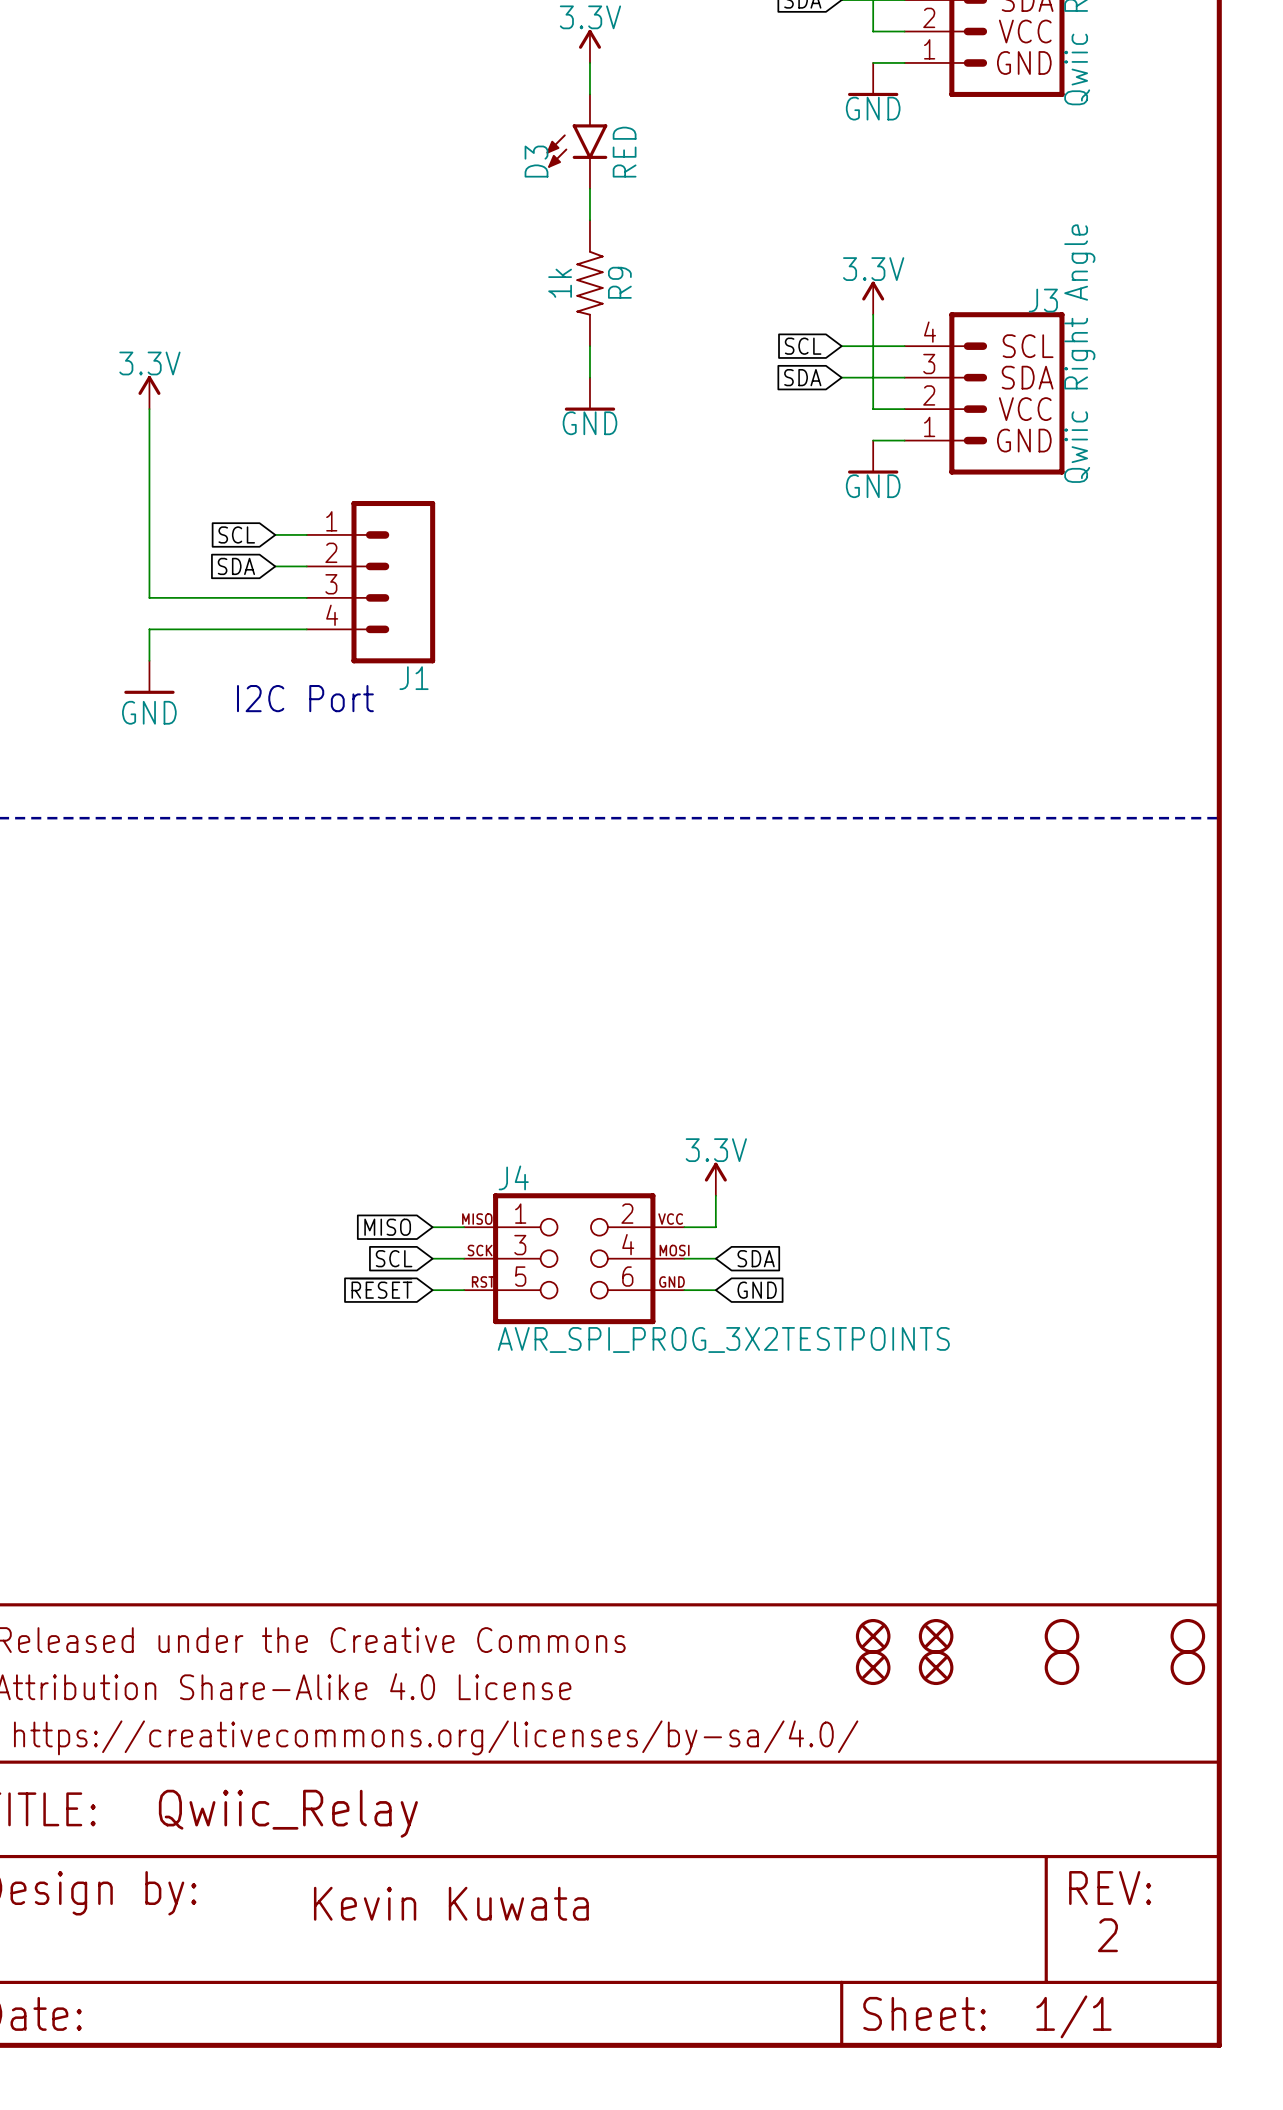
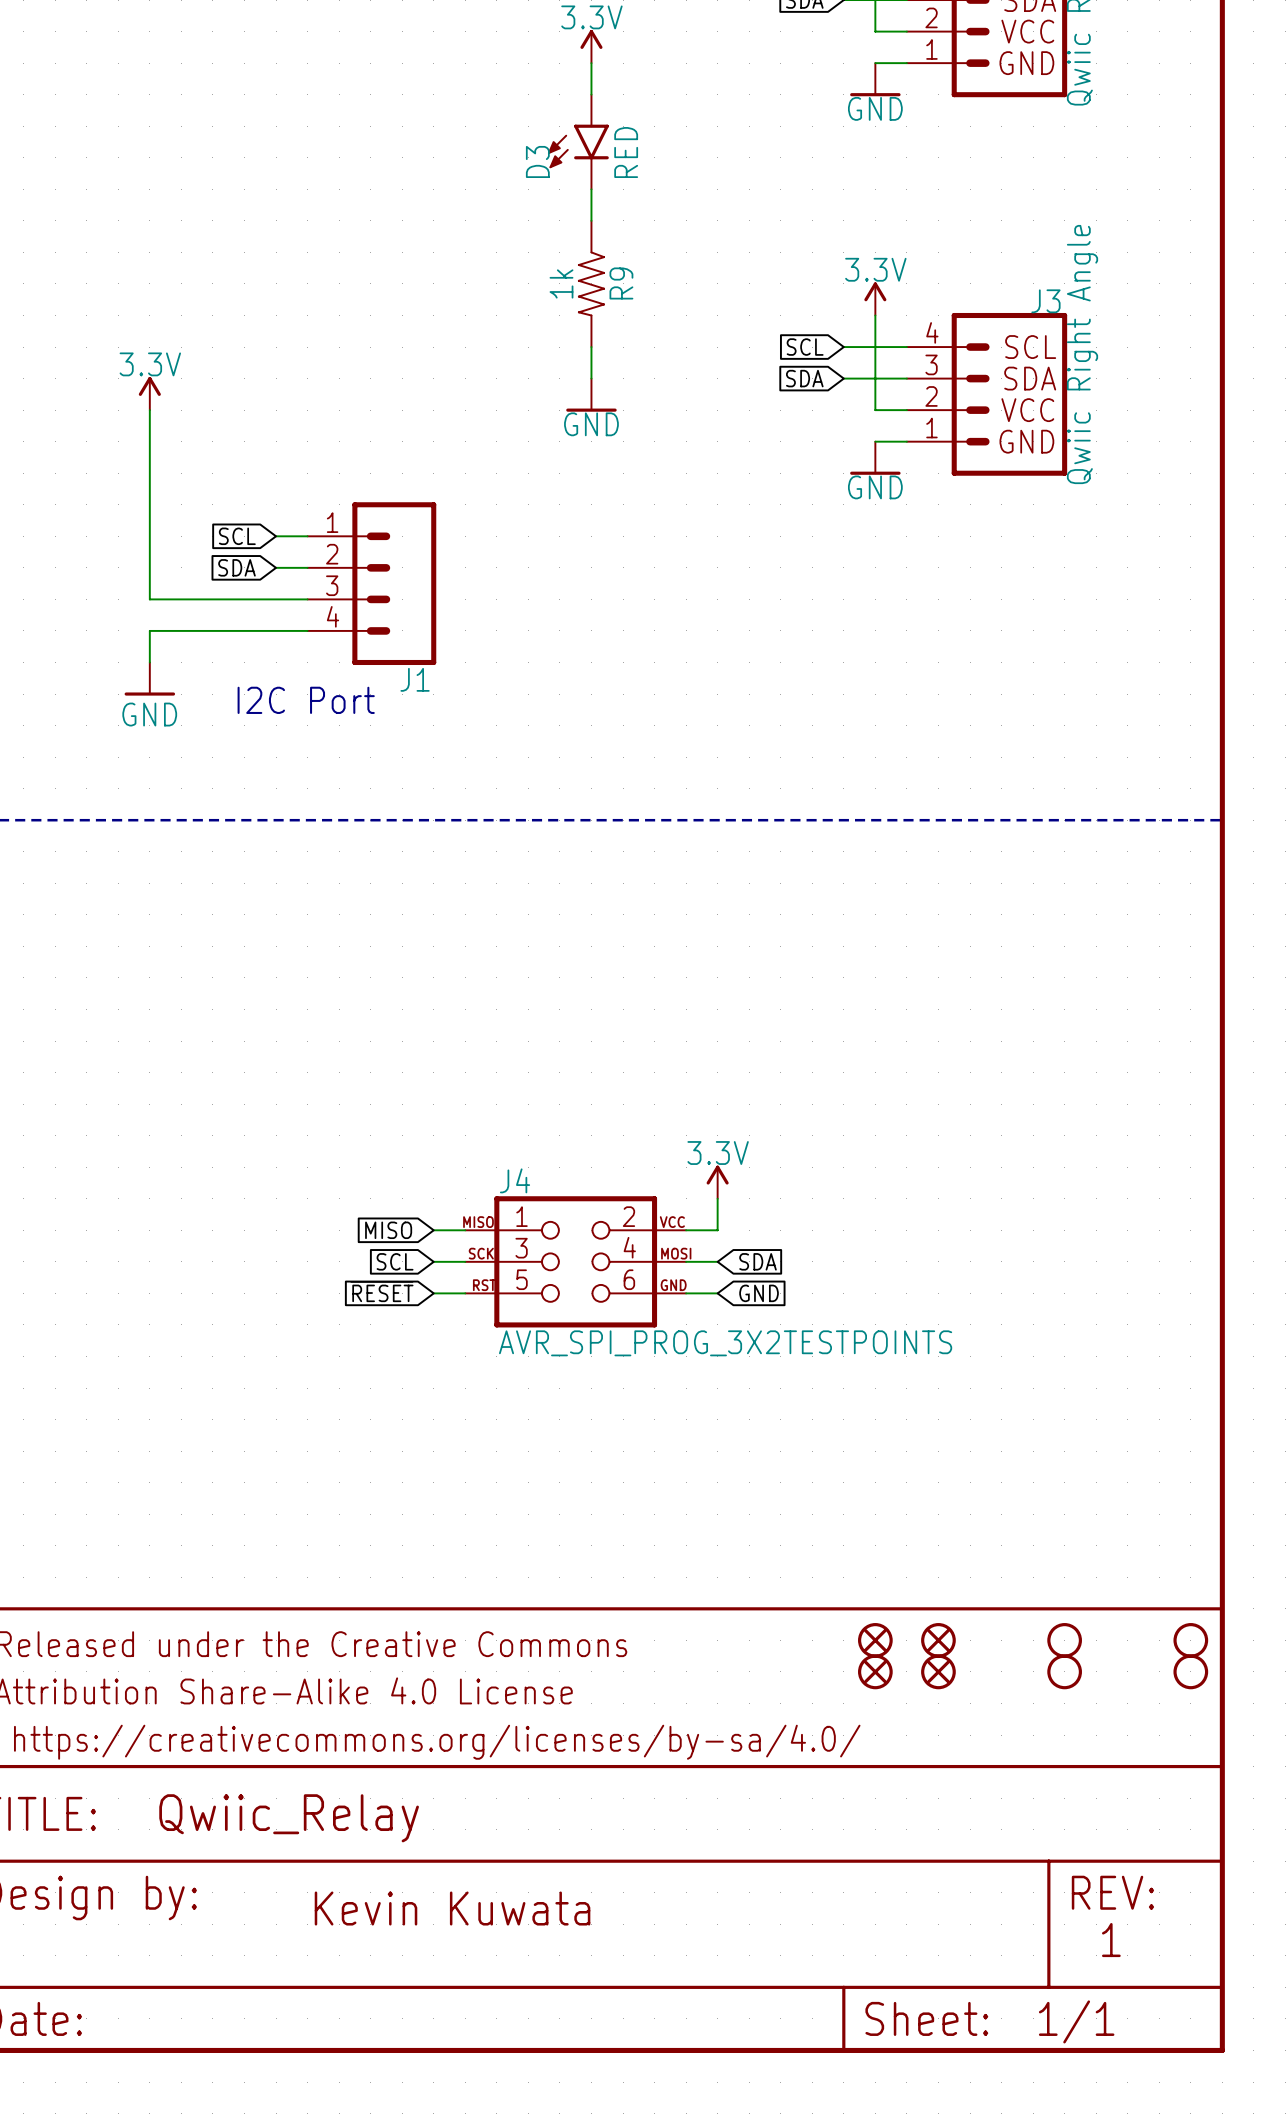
text: 2 (1107, 1935) -> 1 (1111, 1940)

